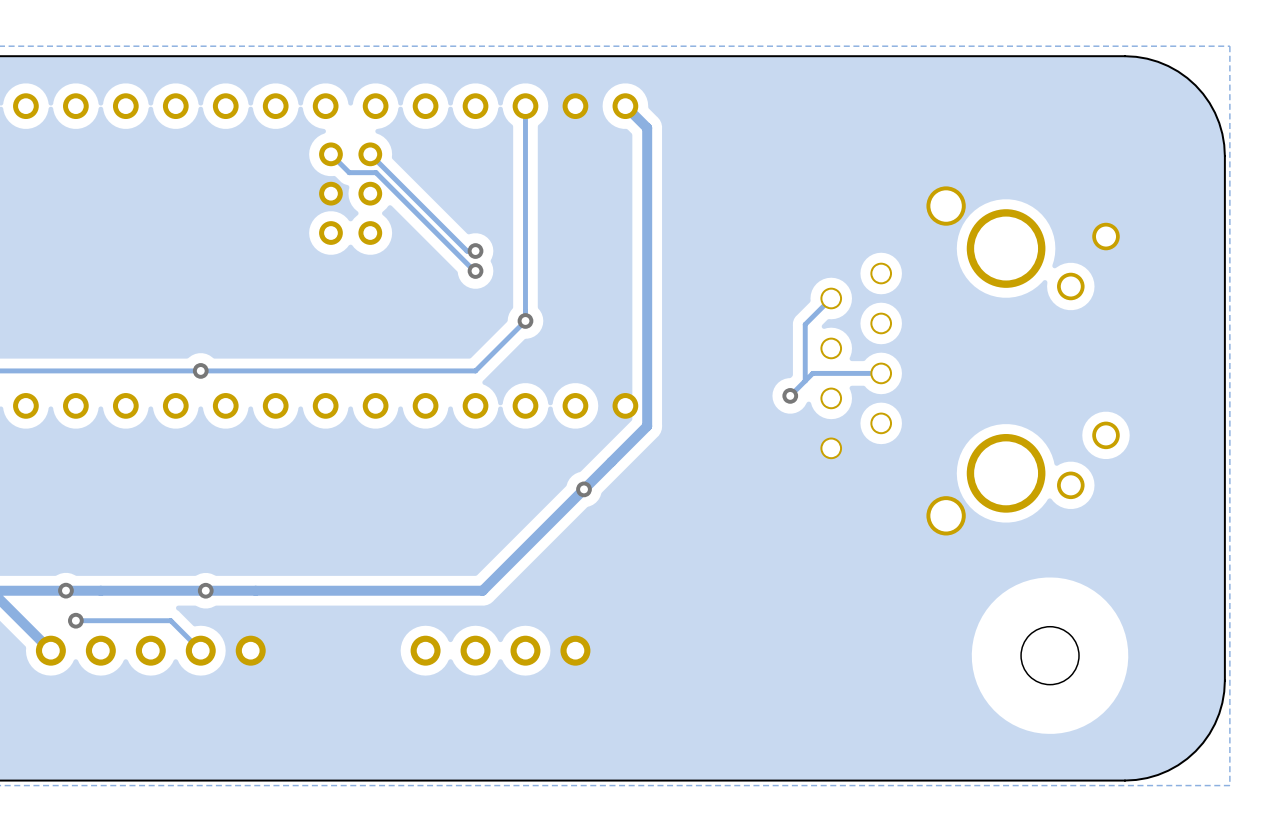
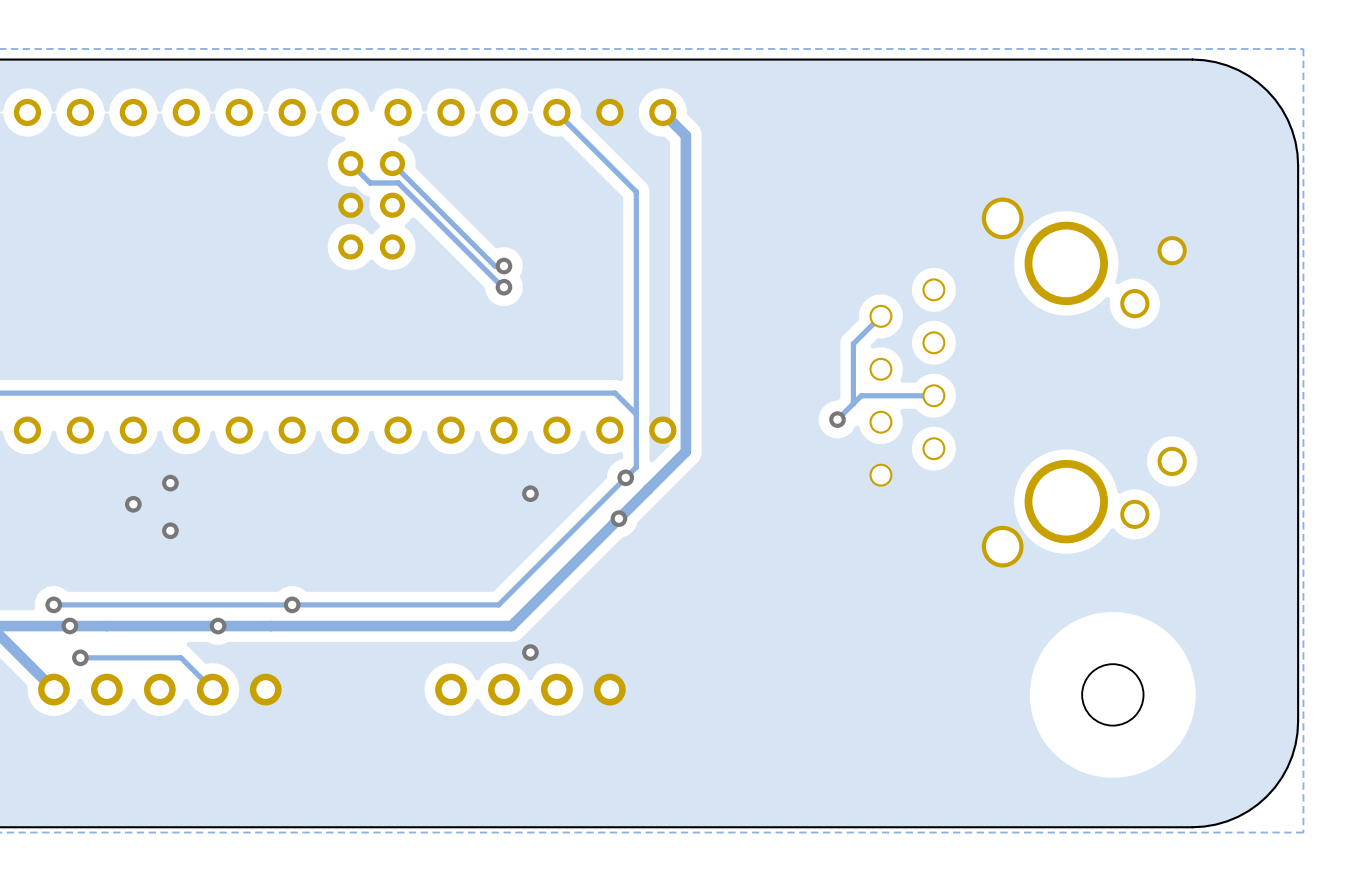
track: (525, 106) (525, 320) (475, 370) -> (636, 414) (615, 393) (503, 393)
track: none -> (556, 112) (636, 191) (636, 467) (498, 604) (53, 604)
via: (525, 320) -> none
via: (200, 370) -> none
via: none -> (625, 477)
via: none -> (170, 483)
via: none -> (530, 493)
via: none -> (133, 504)
via: none -> (170, 530)
via: none -> (53, 604)
via: none -> (292, 604)
via: none -> (530, 652)

